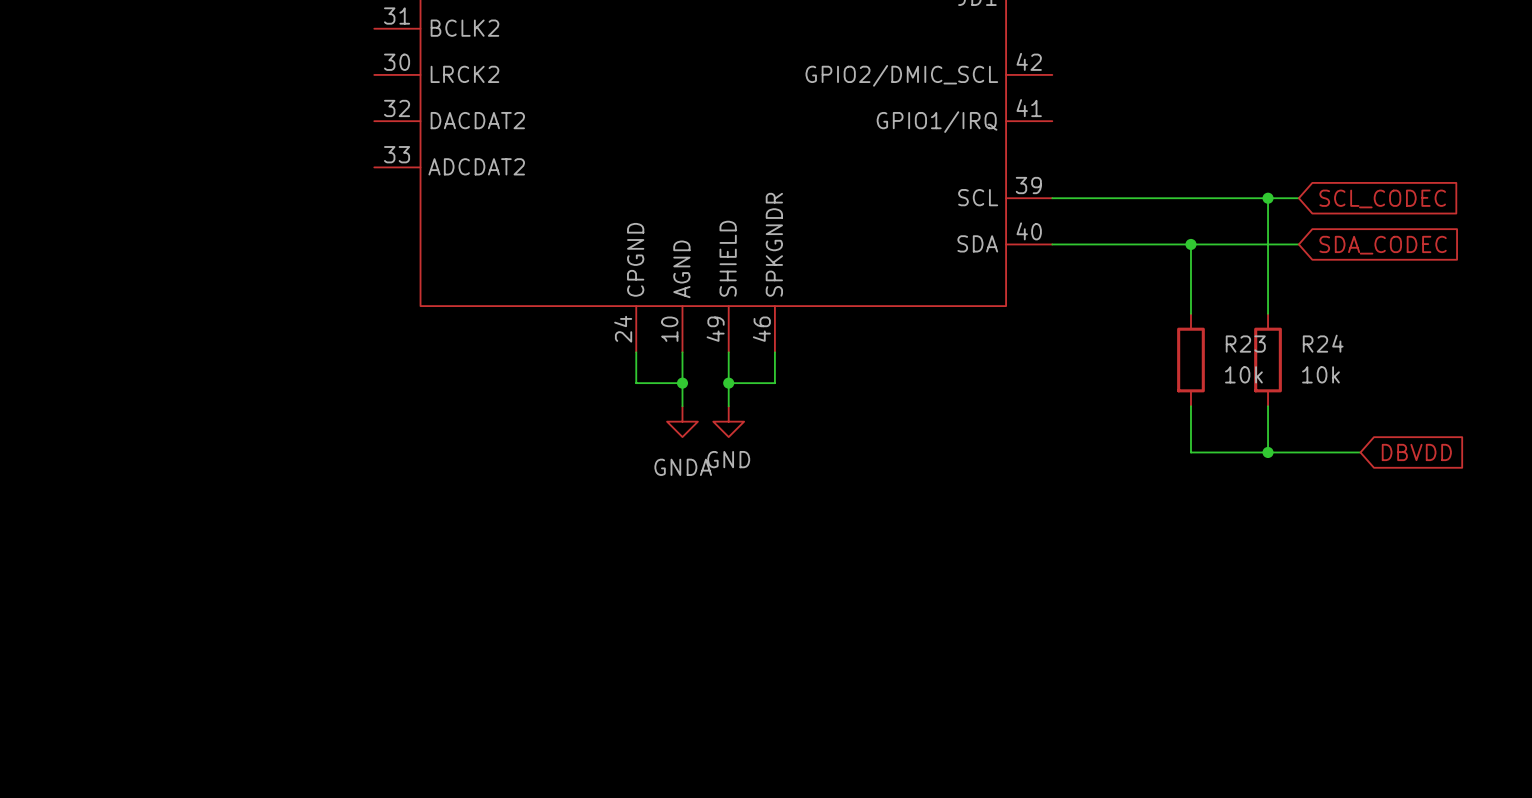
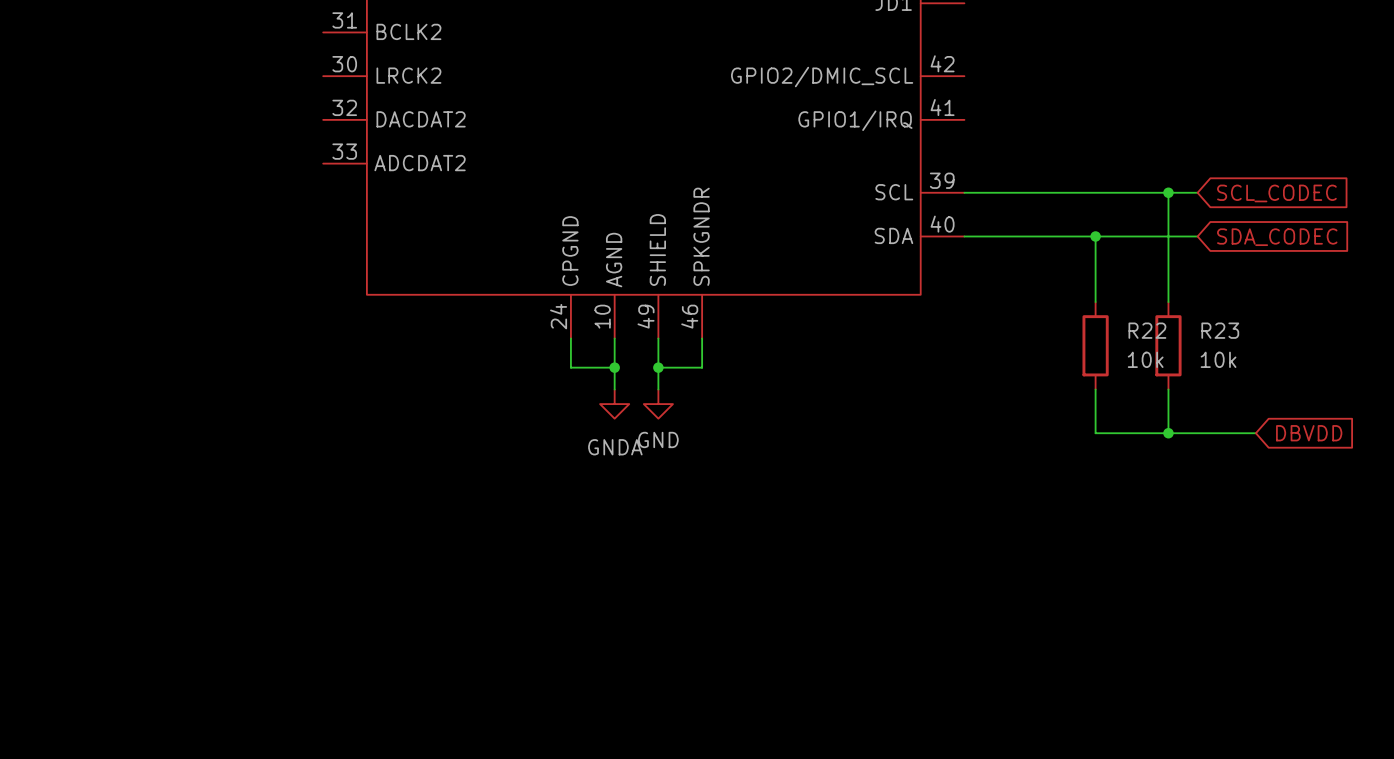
R24 name: R24 (1323, 343) -> R23 (1220, 330)
R23 name: R23 (1245, 344) -> R22 (1147, 330)

